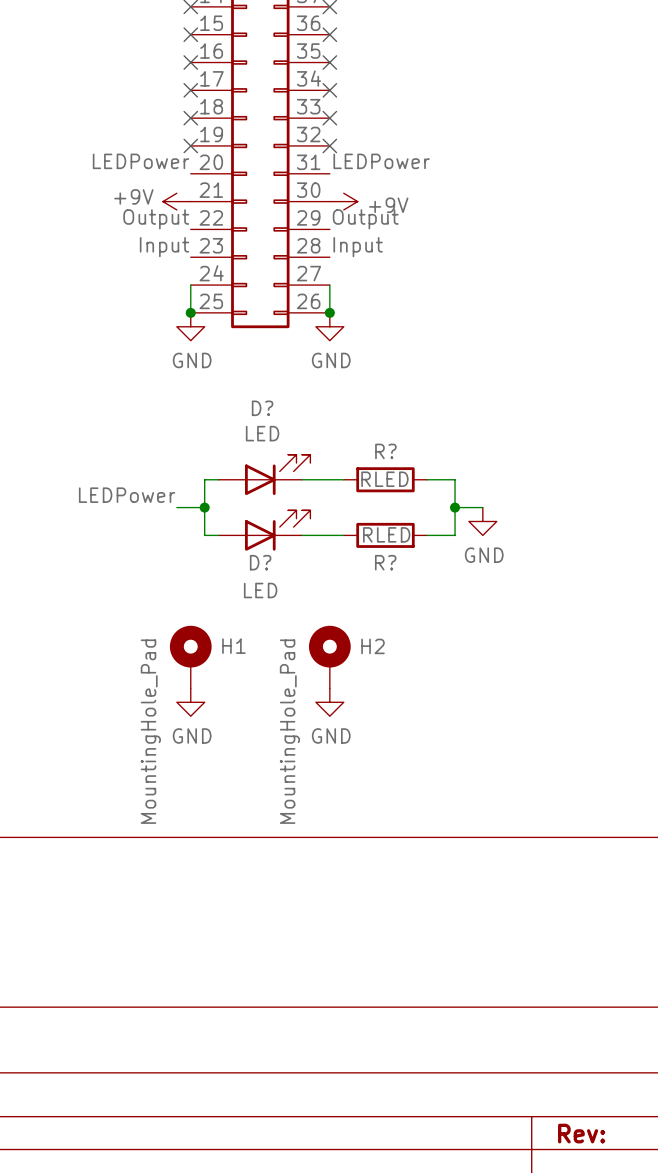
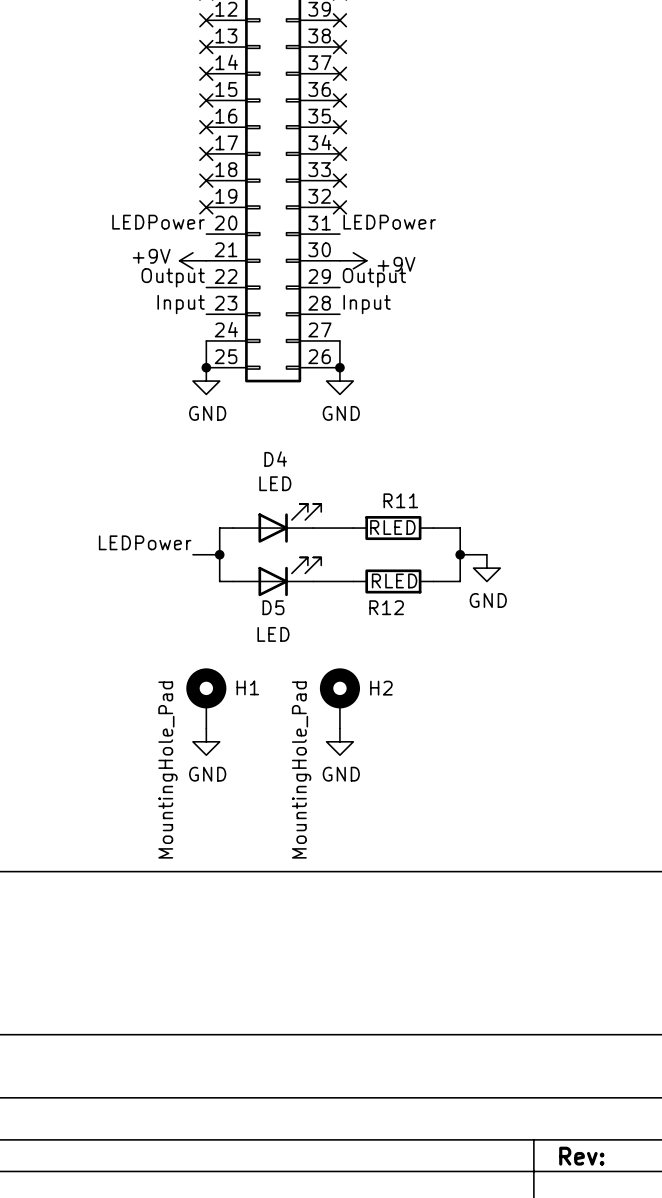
D? name: D? (262, 408) -> D4 (275, 459)
R? name: R? (385, 451) -> R11 (400, 500)
D? name: D? (260, 562) -> D5 (273, 607)
R? name: R? (385, 562) -> R12 (386, 607)

